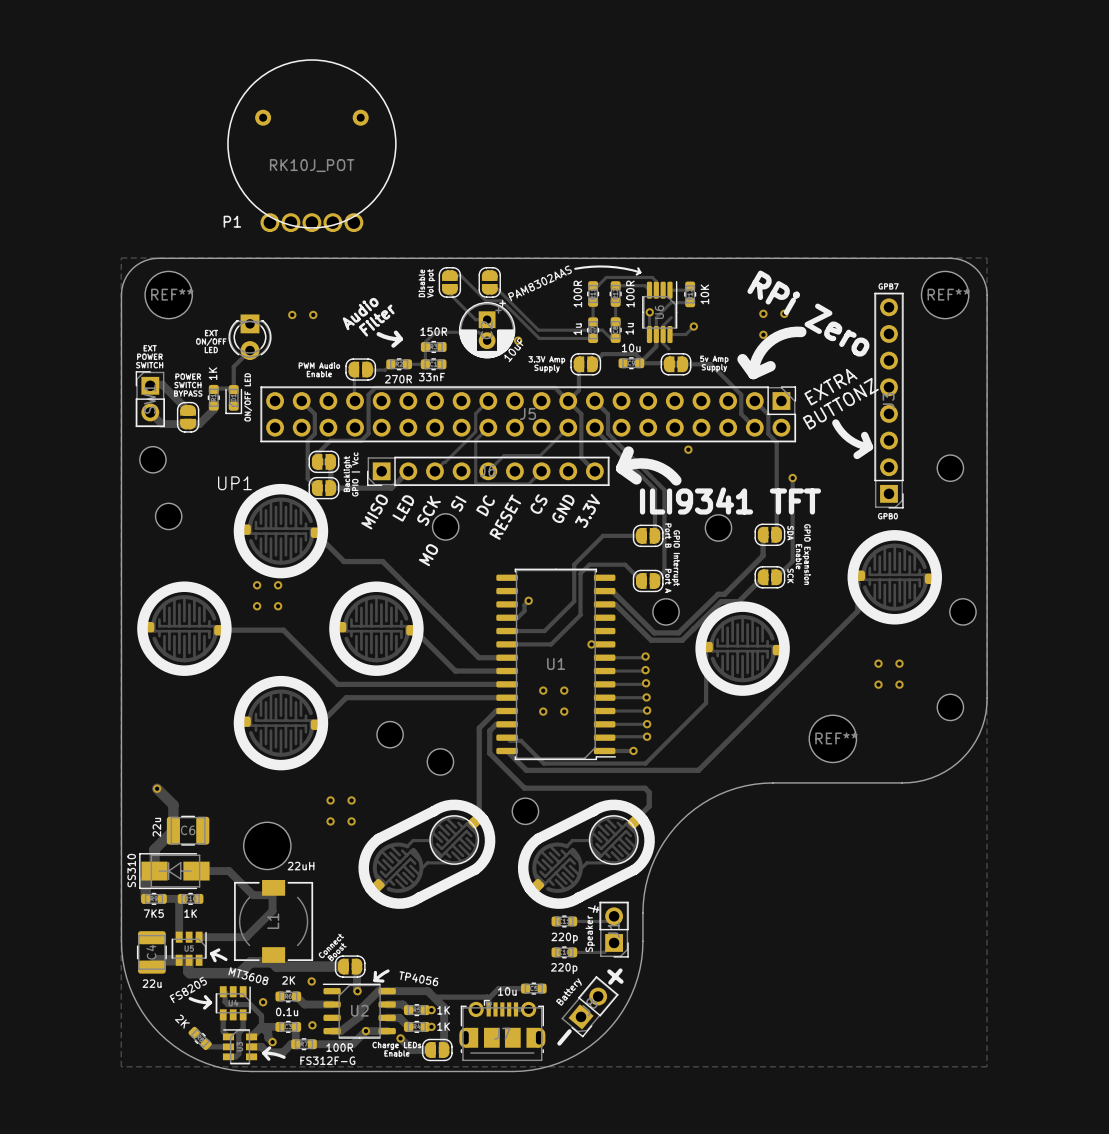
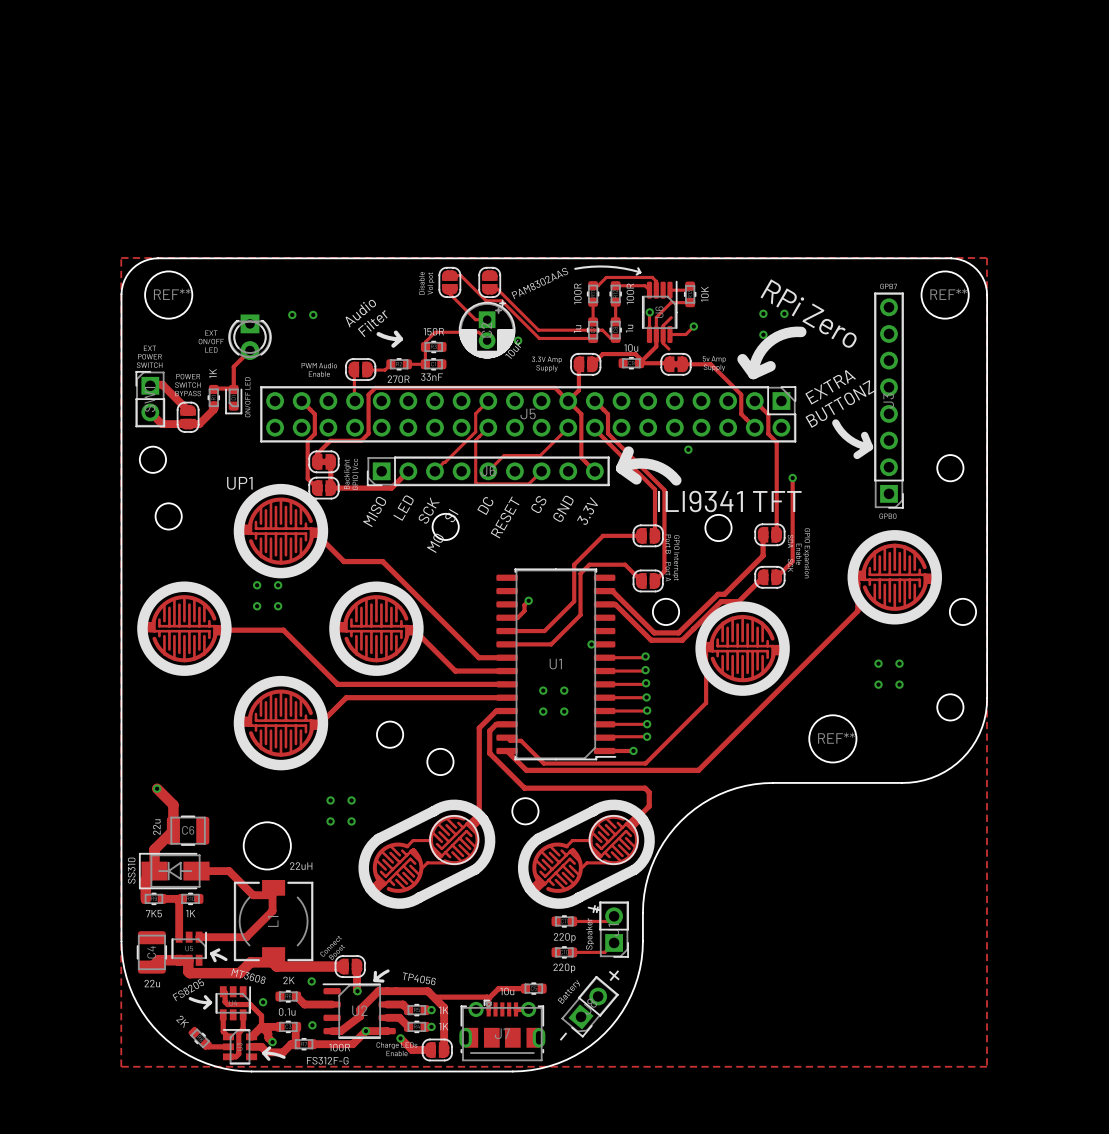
P1: RK10J_POT (311, 145) -> none

